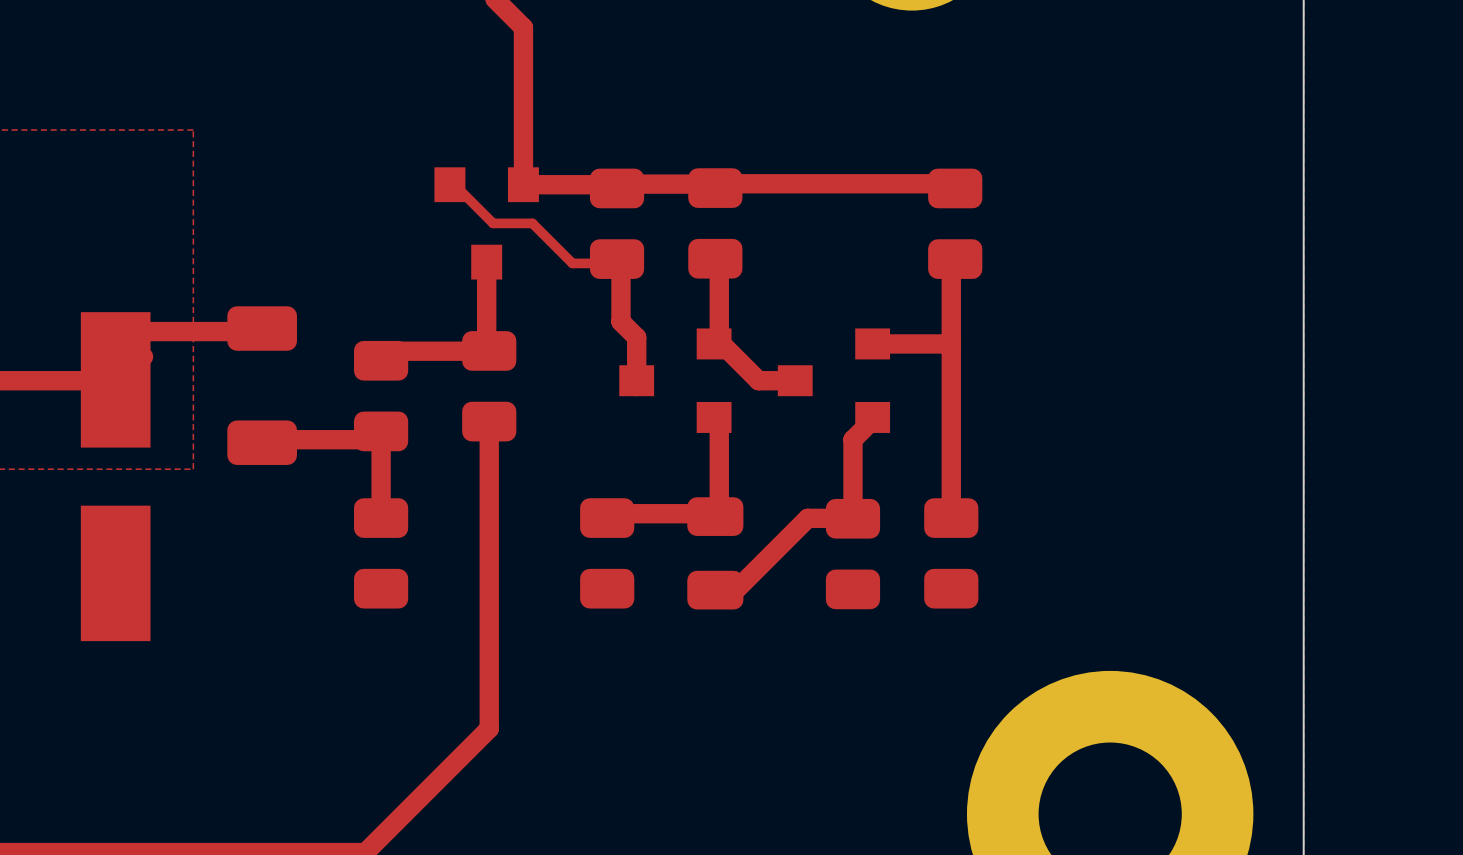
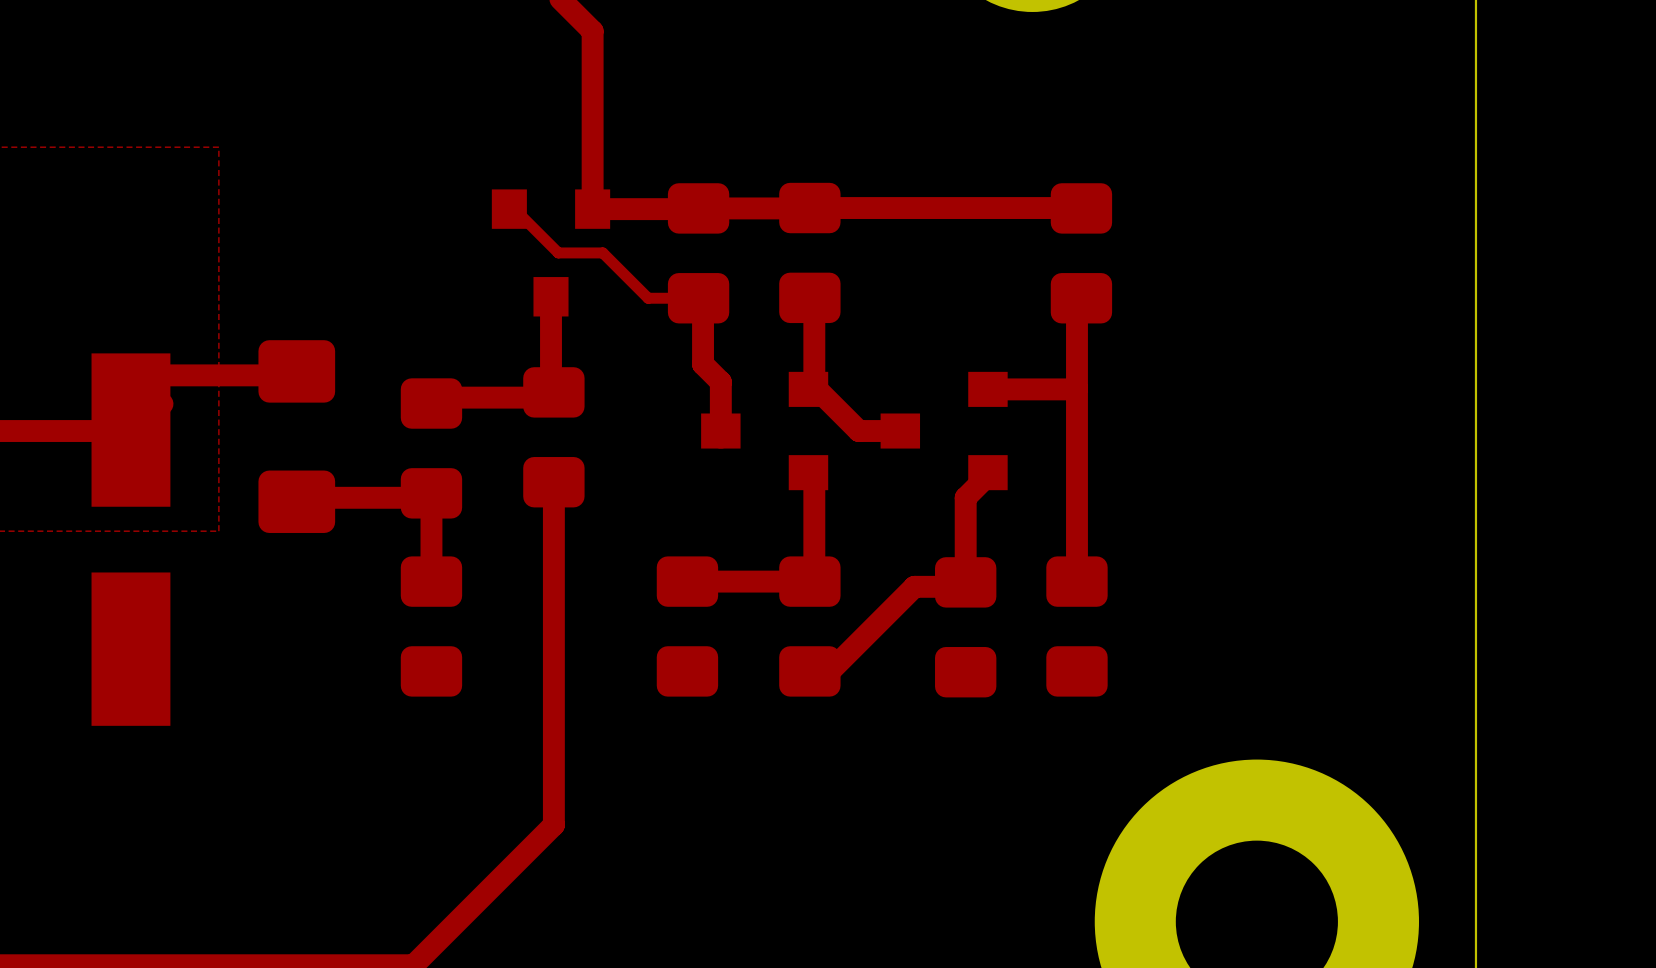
part footprint: [589, 168, 645, 279] -> [667, 183, 730, 324]
part footprint: [688, 168, 743, 279] -> [779, 182, 841, 324]
part footprint: [928, 168, 983, 279] -> [1050, 183, 1113, 324]
part footprint: [227, 306, 297, 465] -> [258, 340, 336, 533]
part footprint: [462, 331, 517, 442] -> [523, 367, 585, 508]
part footprint: [354, 340, 409, 452] -> [400, 378, 463, 519]
part footprint: [687, 497, 744, 610] -> [779, 556, 841, 697]
part footprint: [354, 498, 409, 609] -> [400, 556, 463, 697]
part footprint: [580, 498, 635, 609] -> [656, 556, 719, 697]
part footprint: [825, 498, 881, 610] -> [935, 557, 997, 698]
part footprint: [924, 498, 979, 609] -> [1046, 556, 1108, 697]

